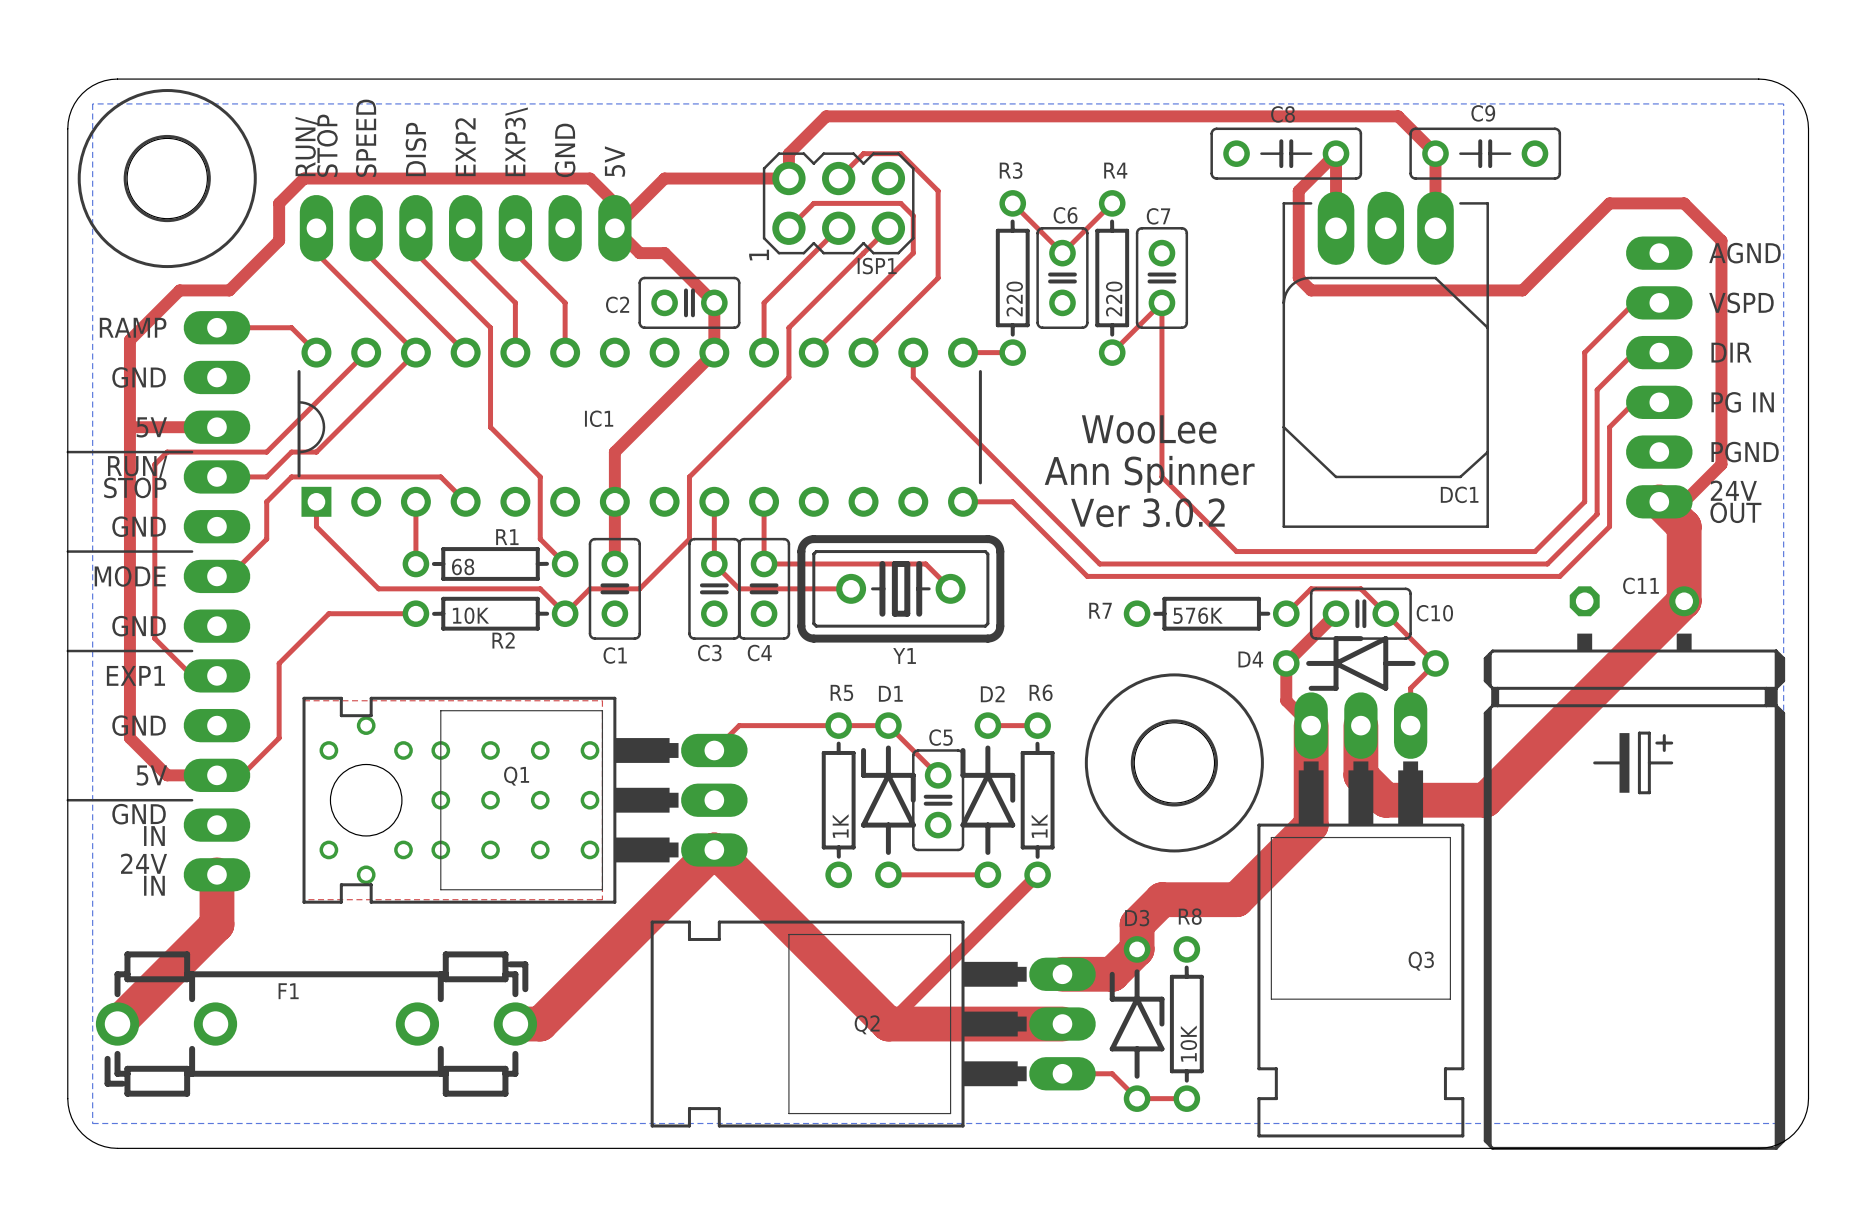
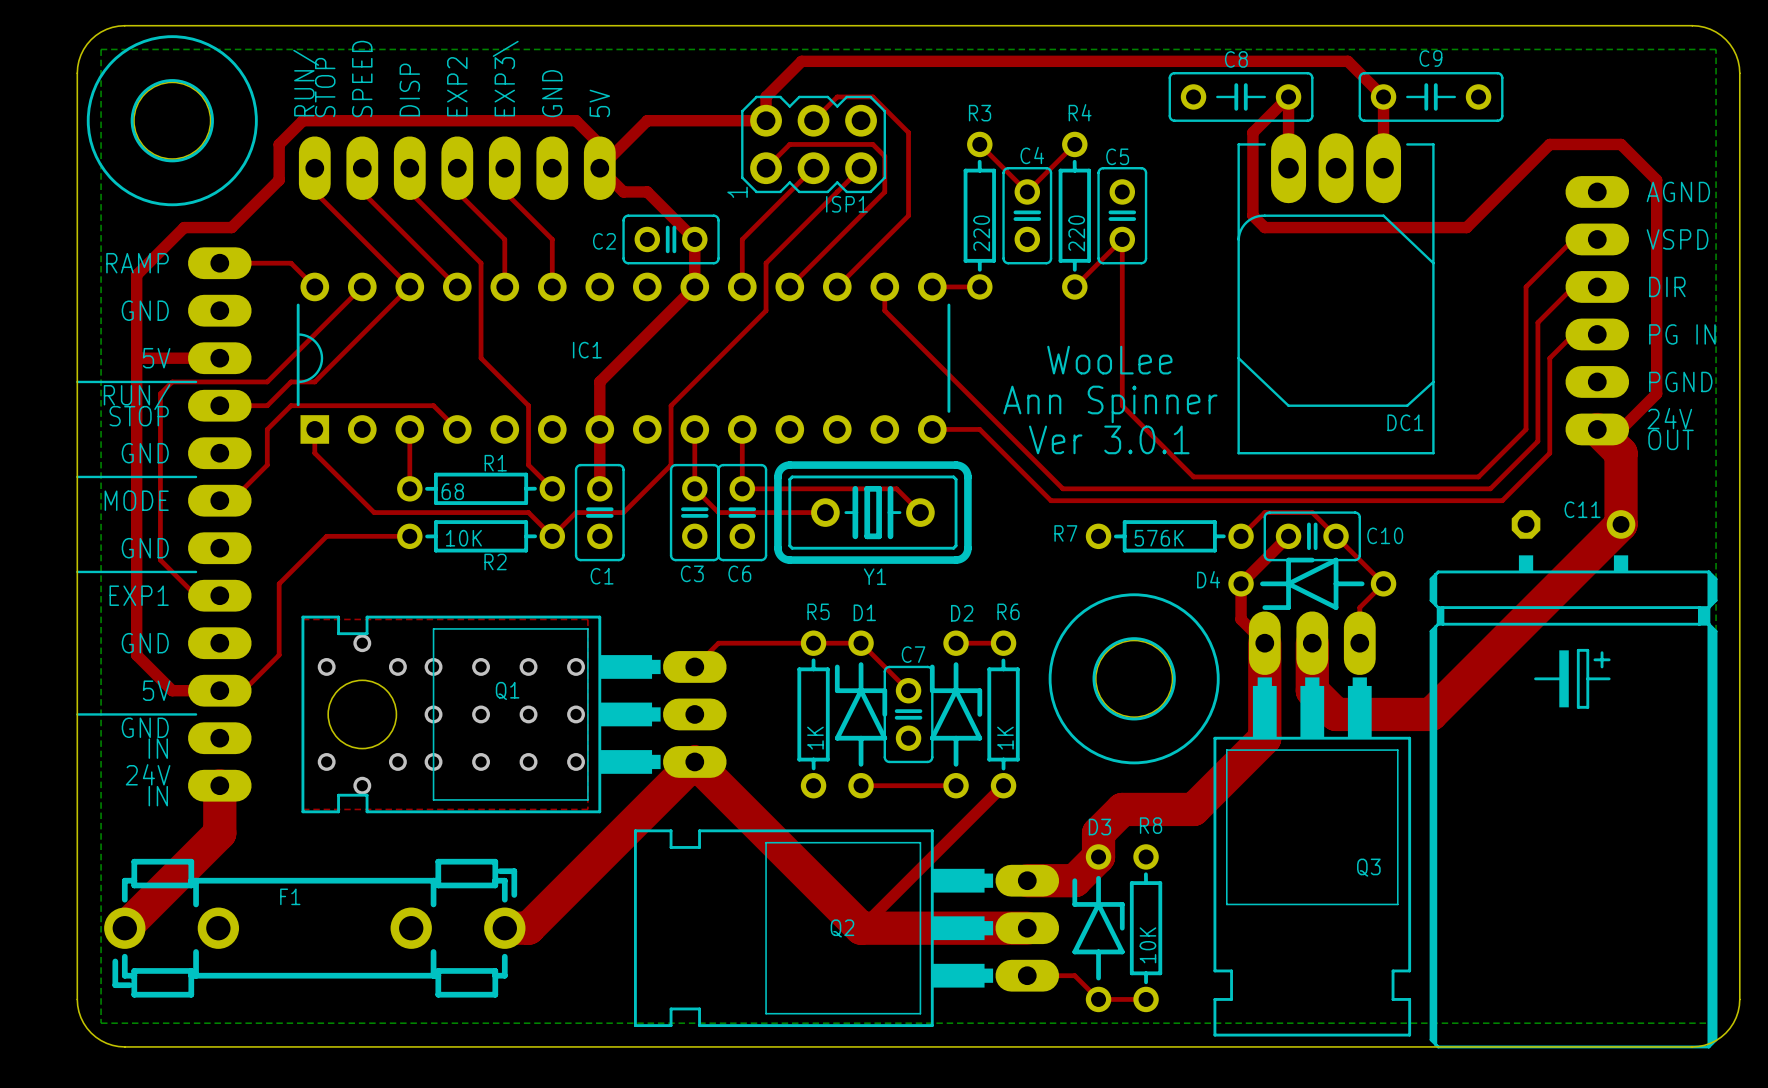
C6 name: C6 (1065, 215) -> C4 (1032, 155)
C7 name: C7 (1158, 216) -> C5 (1117, 156)
text: Ver 3.0.2 (1147, 512) -> Ver 3.0.1 (1109, 439)
C4 name: C4 (759, 653) -> C6 (739, 573)
C5 name: C5 (941, 737) -> C7 (913, 654)

